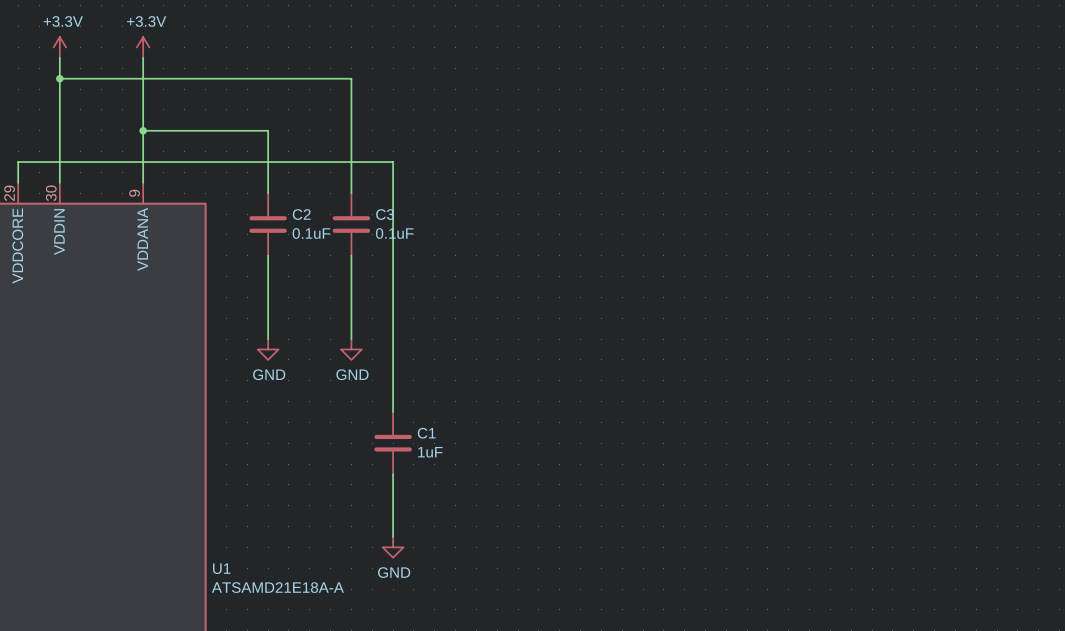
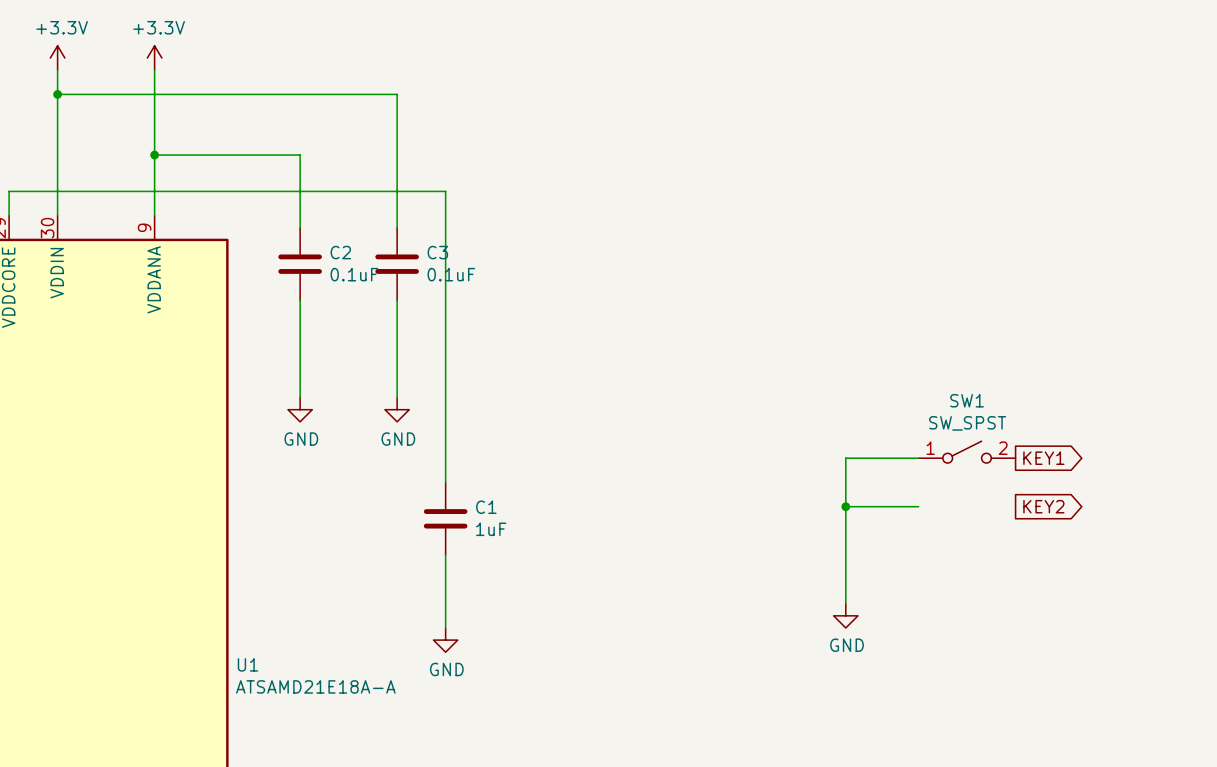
SW1: none -> SW_SPST (967, 452)
wire: none -> (918, 458) (845, 458) (845, 603)
global label: none -> KEY1 (1043, 458)
wire: none -> (845, 506) (918, 506)
junction: none -> (845, 506)
global label: none -> KEY2 (1043, 506)
power symbol: none -> GND (845, 615)

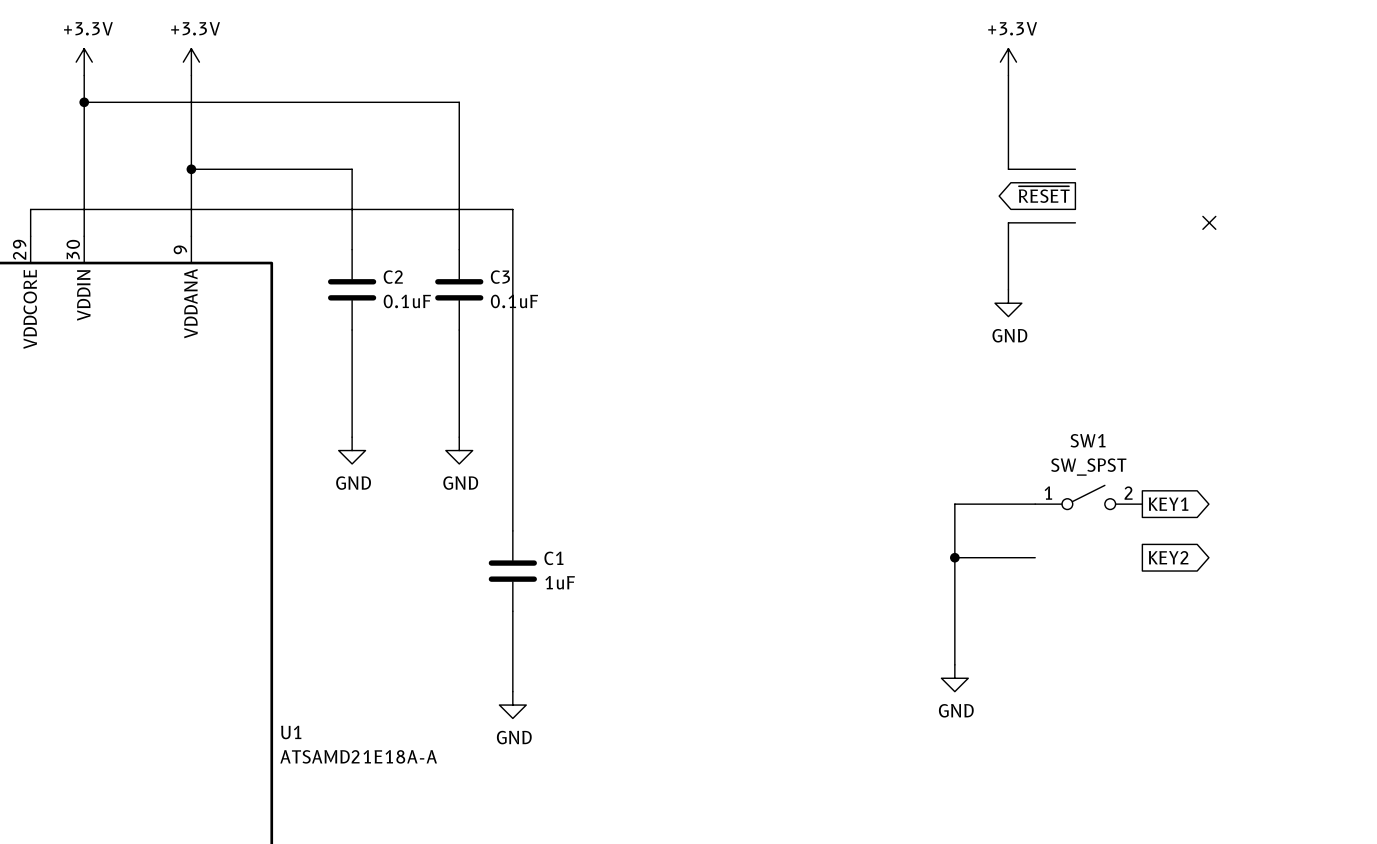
power symbol: none -> +3.3V (1008, 62)
wire: none -> (1008, 75) (1008, 169) (1075, 169)
global label: none -> ~{RESET} (1044, 194)
wire: none -> (1075, 222) (1008, 222) (1008, 289)
no-connect mark: none -> (1209, 222)
power symbol: none -> GND (1008, 303)

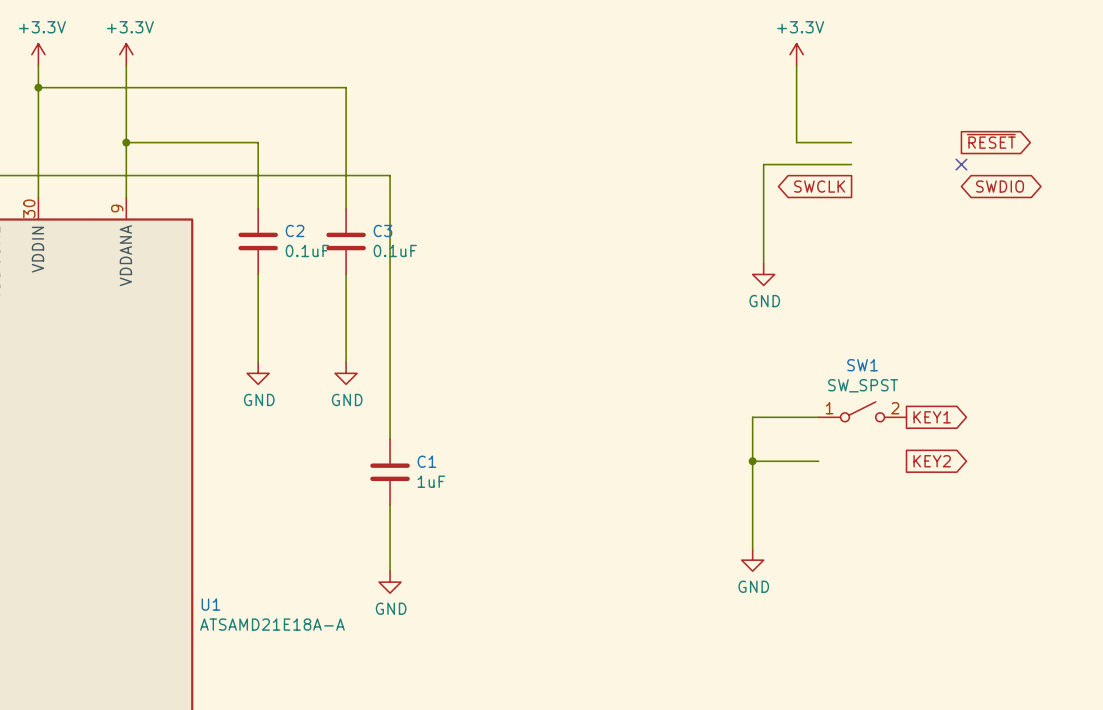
global label rotation: 0° (1044, 194) -> 180° (991, 141)
global label position: ~{RESET} (1044, 194) -> ~{RESET} (991, 141)
wire: none -> (851, 164) (763, 164) (763, 263)
global label: none -> SWCLK (819, 186)
wire: (1075, 222) (1008, 222) (1008, 289) -> none
no-connect mark position: (1209, 222) -> (961, 164)
global label: none -> SWDIO (1000, 186)
power symbol position: GND (1008, 303) -> GND (763, 274)

